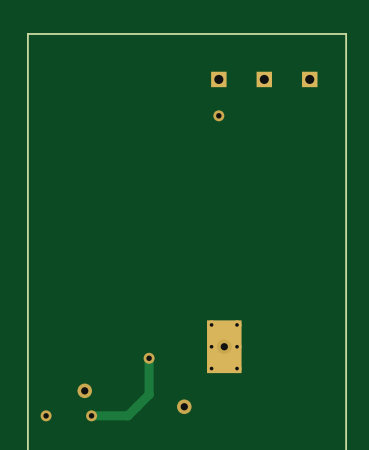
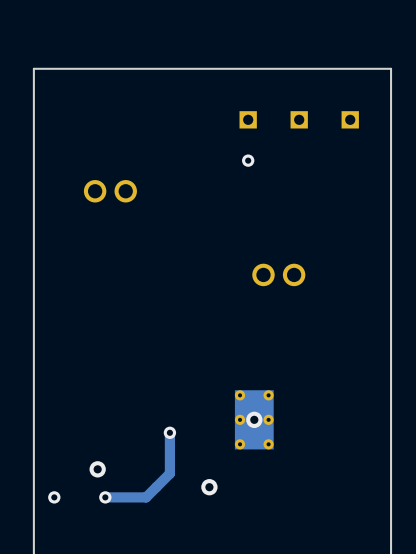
part: none -> (110, 191)
part: none -> (278, 274)

